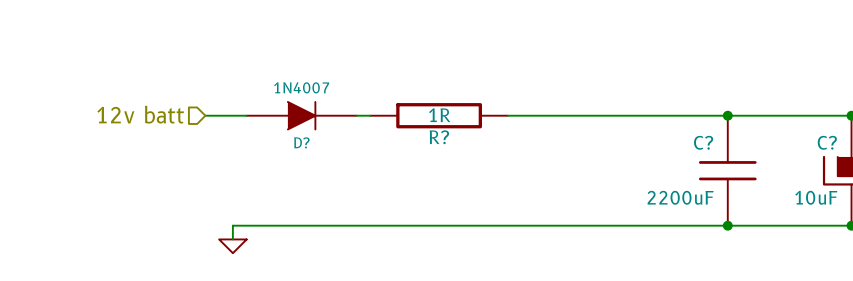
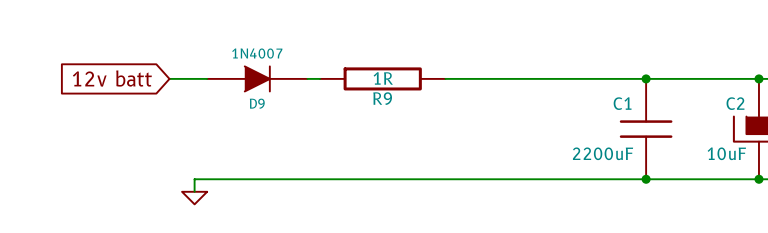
hierarchical label: 12v batt (140, 114) -> none
global label: none -> 12v batt (112, 78)
R? name: R? (439, 137) -> R9 (382, 98)
D? name: D? (301, 142) -> D9 (257, 103)
C? name: C? (703, 142) -> C1 (622, 103)
C? name: C? (827, 142) -> C2 (735, 103)

